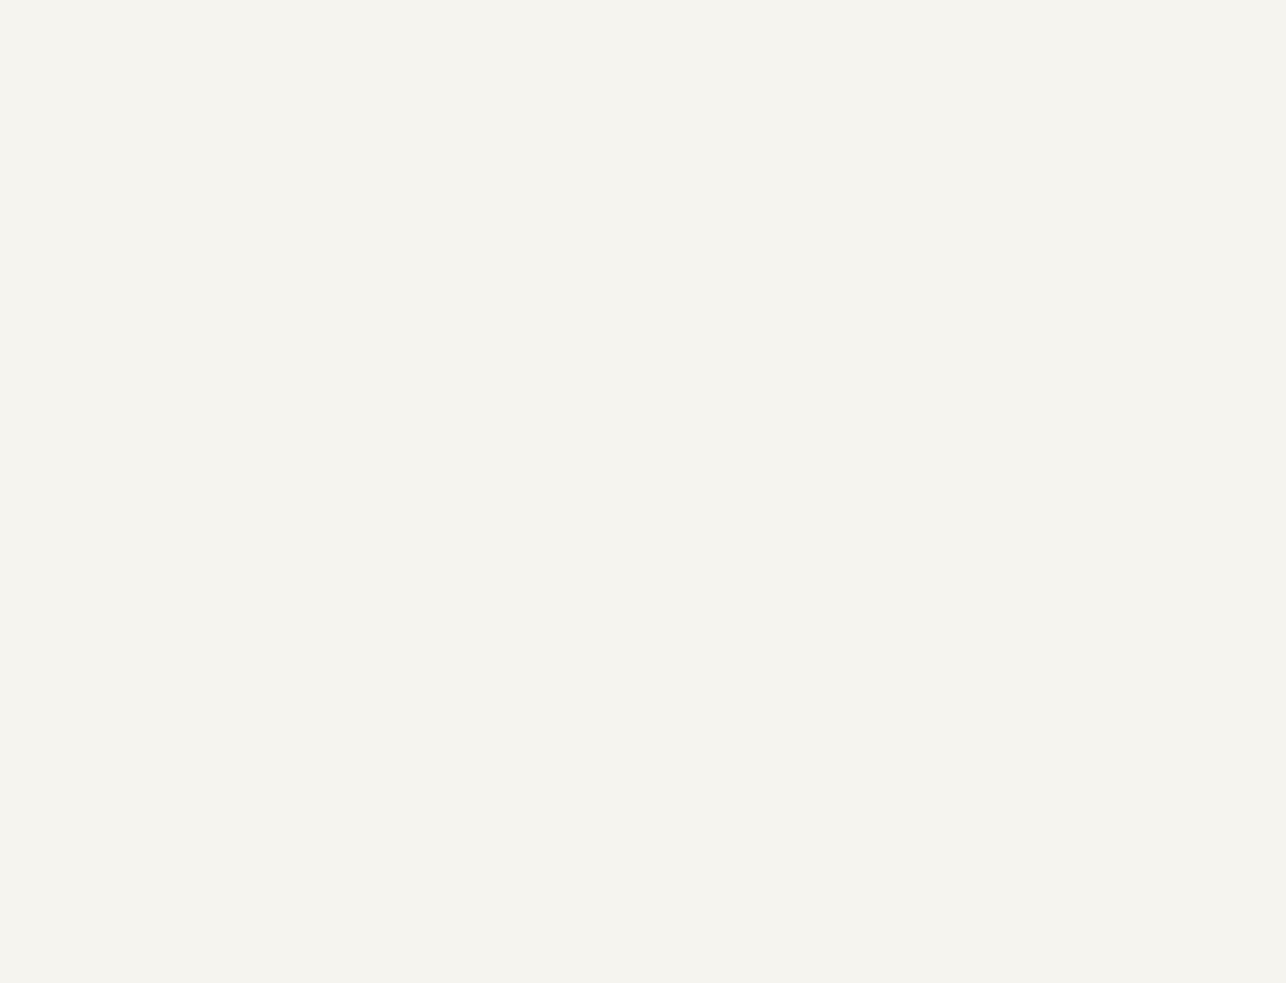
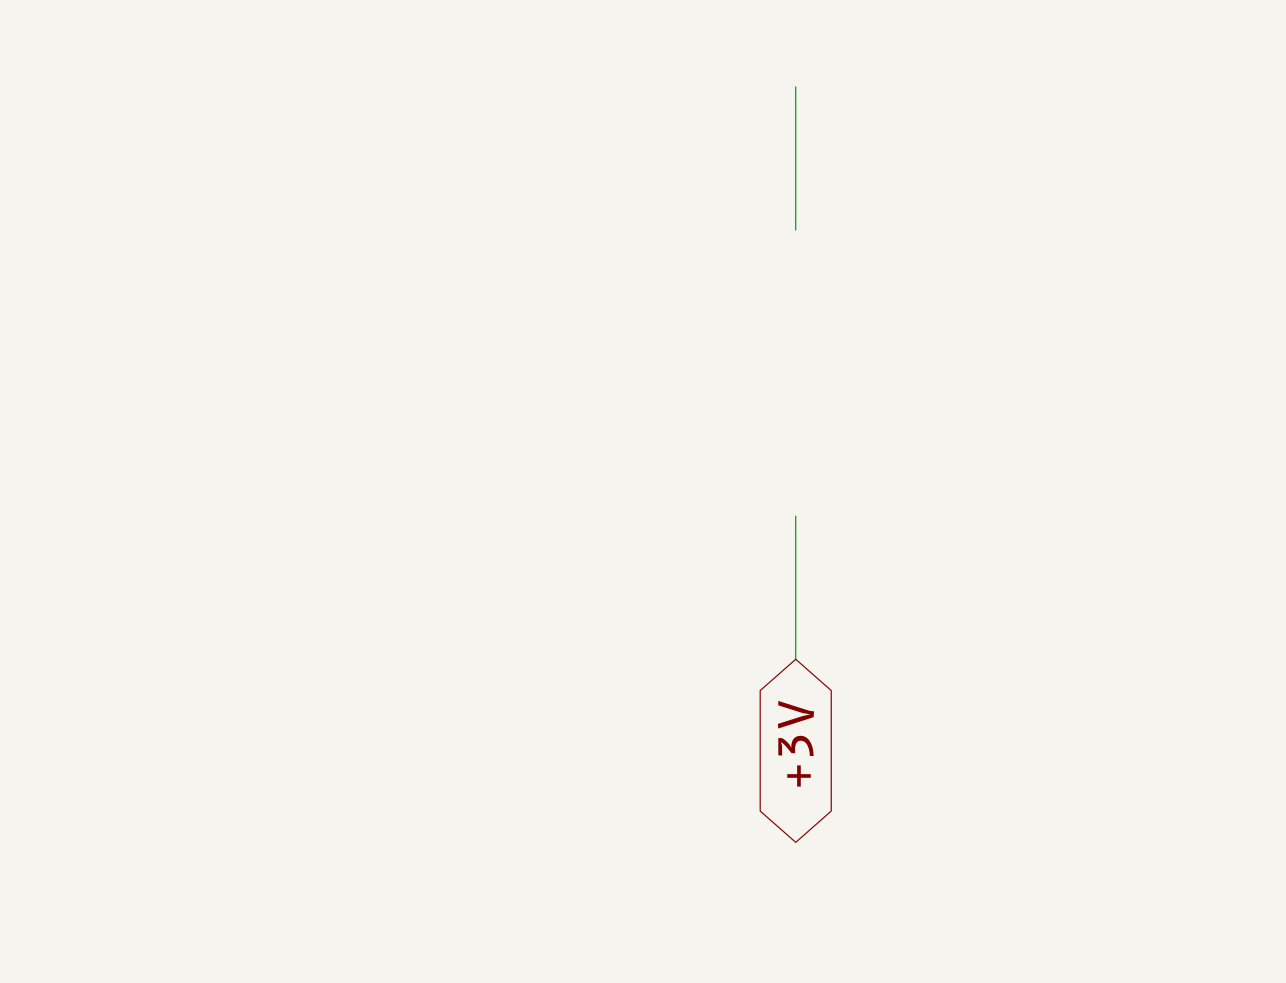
wire: none -> (795, 86) (795, 229)
wire: none -> (795, 516) (795, 659)
global label: none -> +3V (795, 743)

